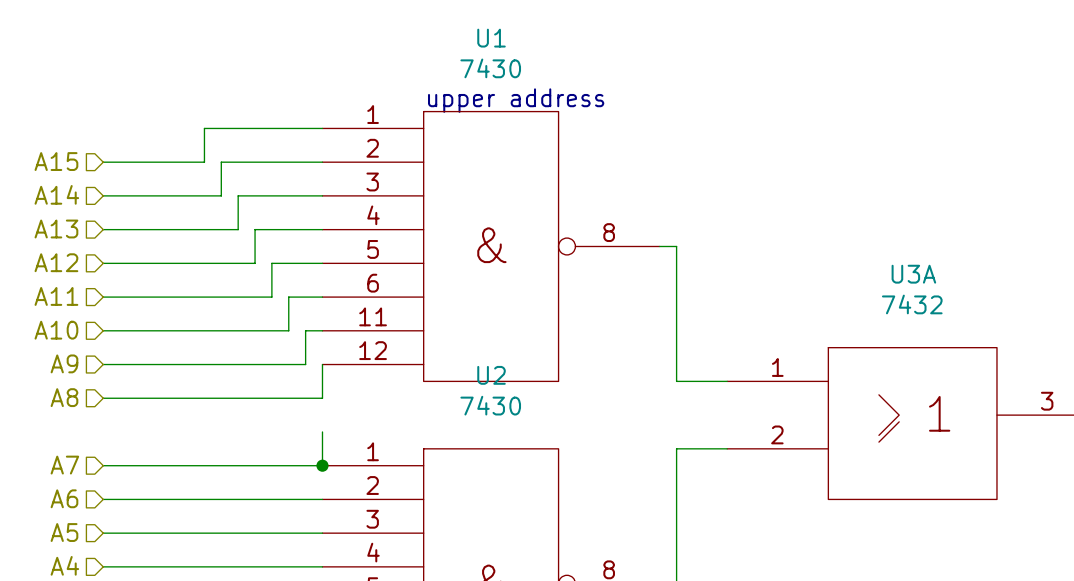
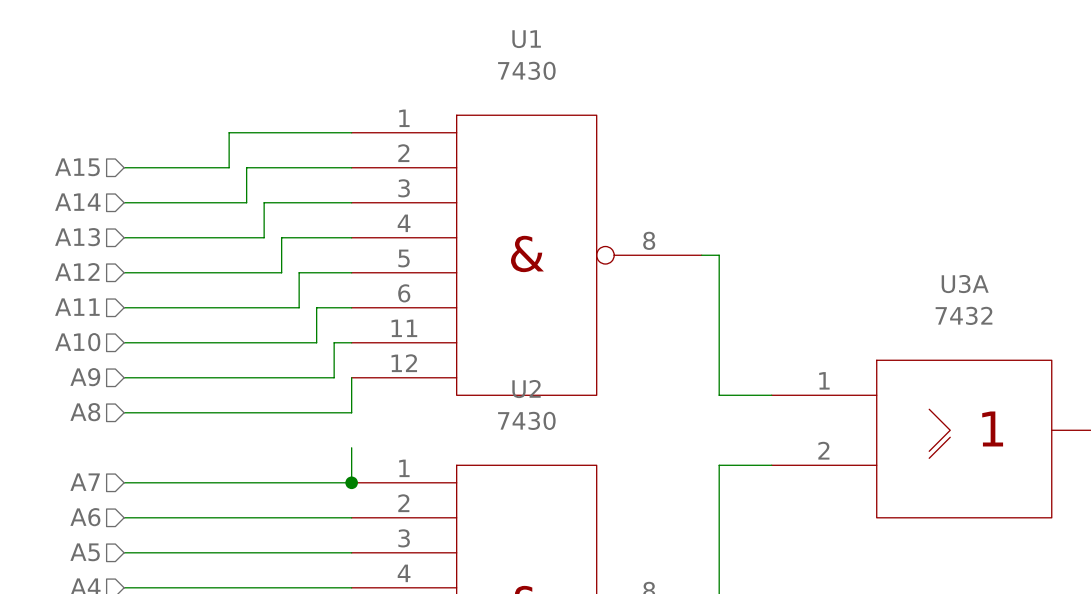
text: upper address (516, 100) -> none

